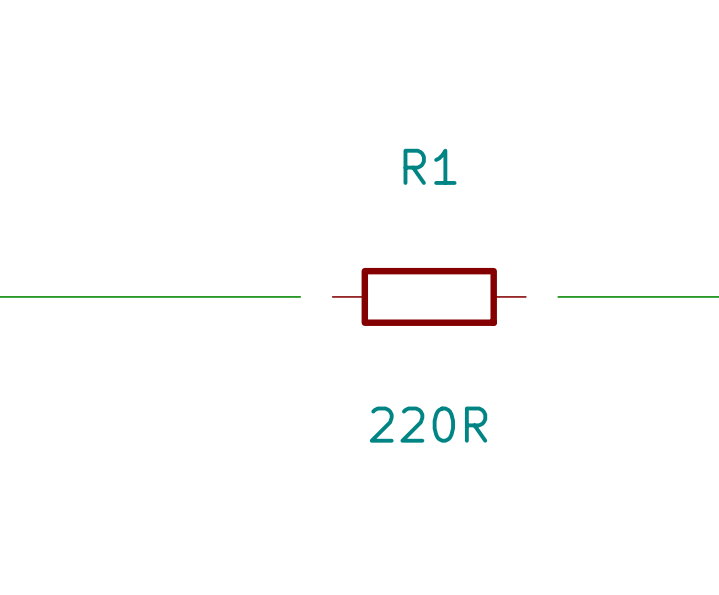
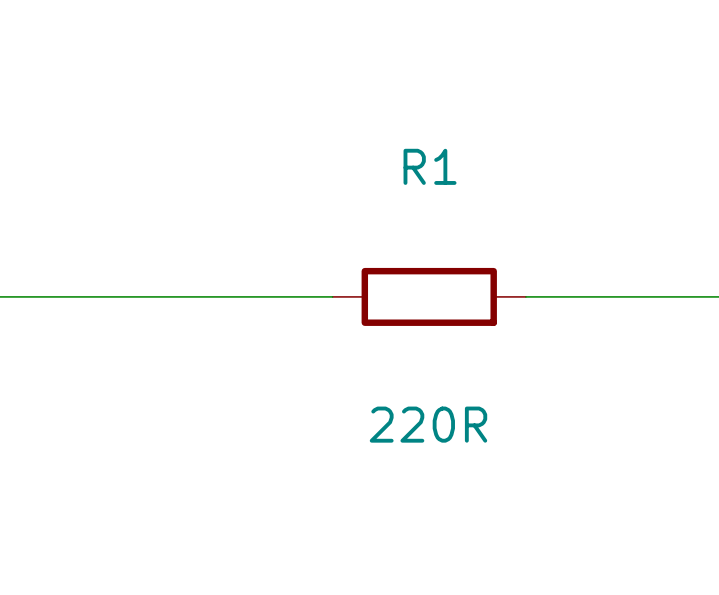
wire: none -> (300, 296) (332, 296)
wire: none -> (525, 296) (558, 296)

